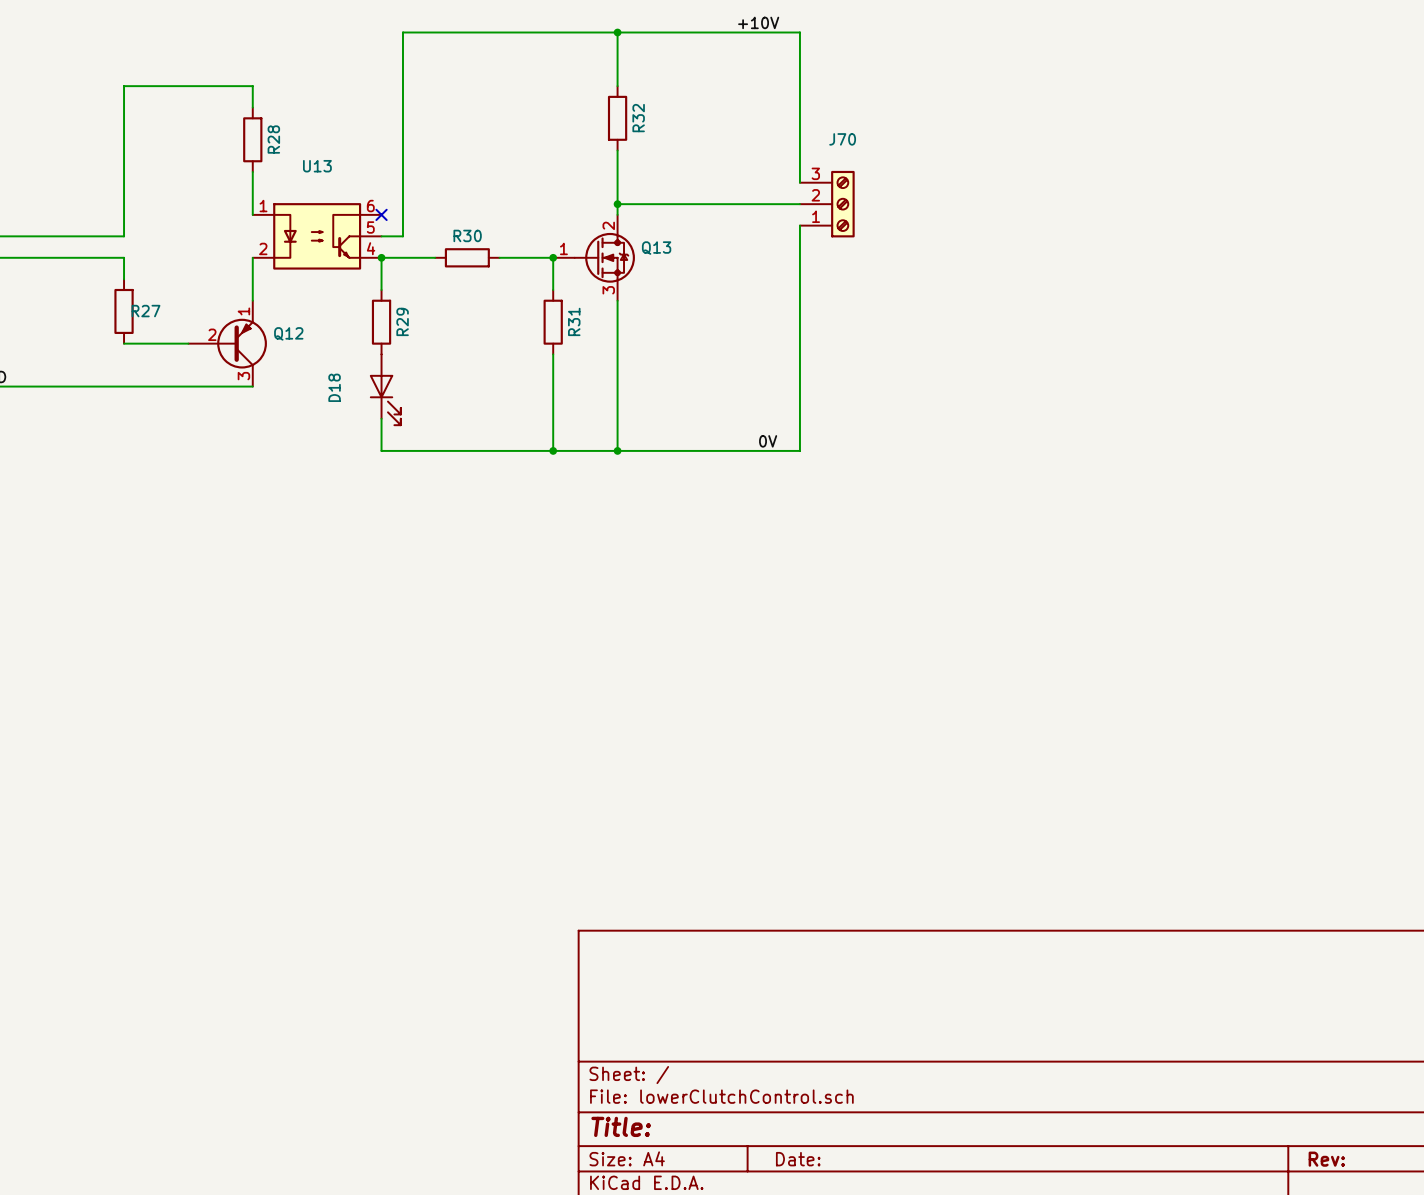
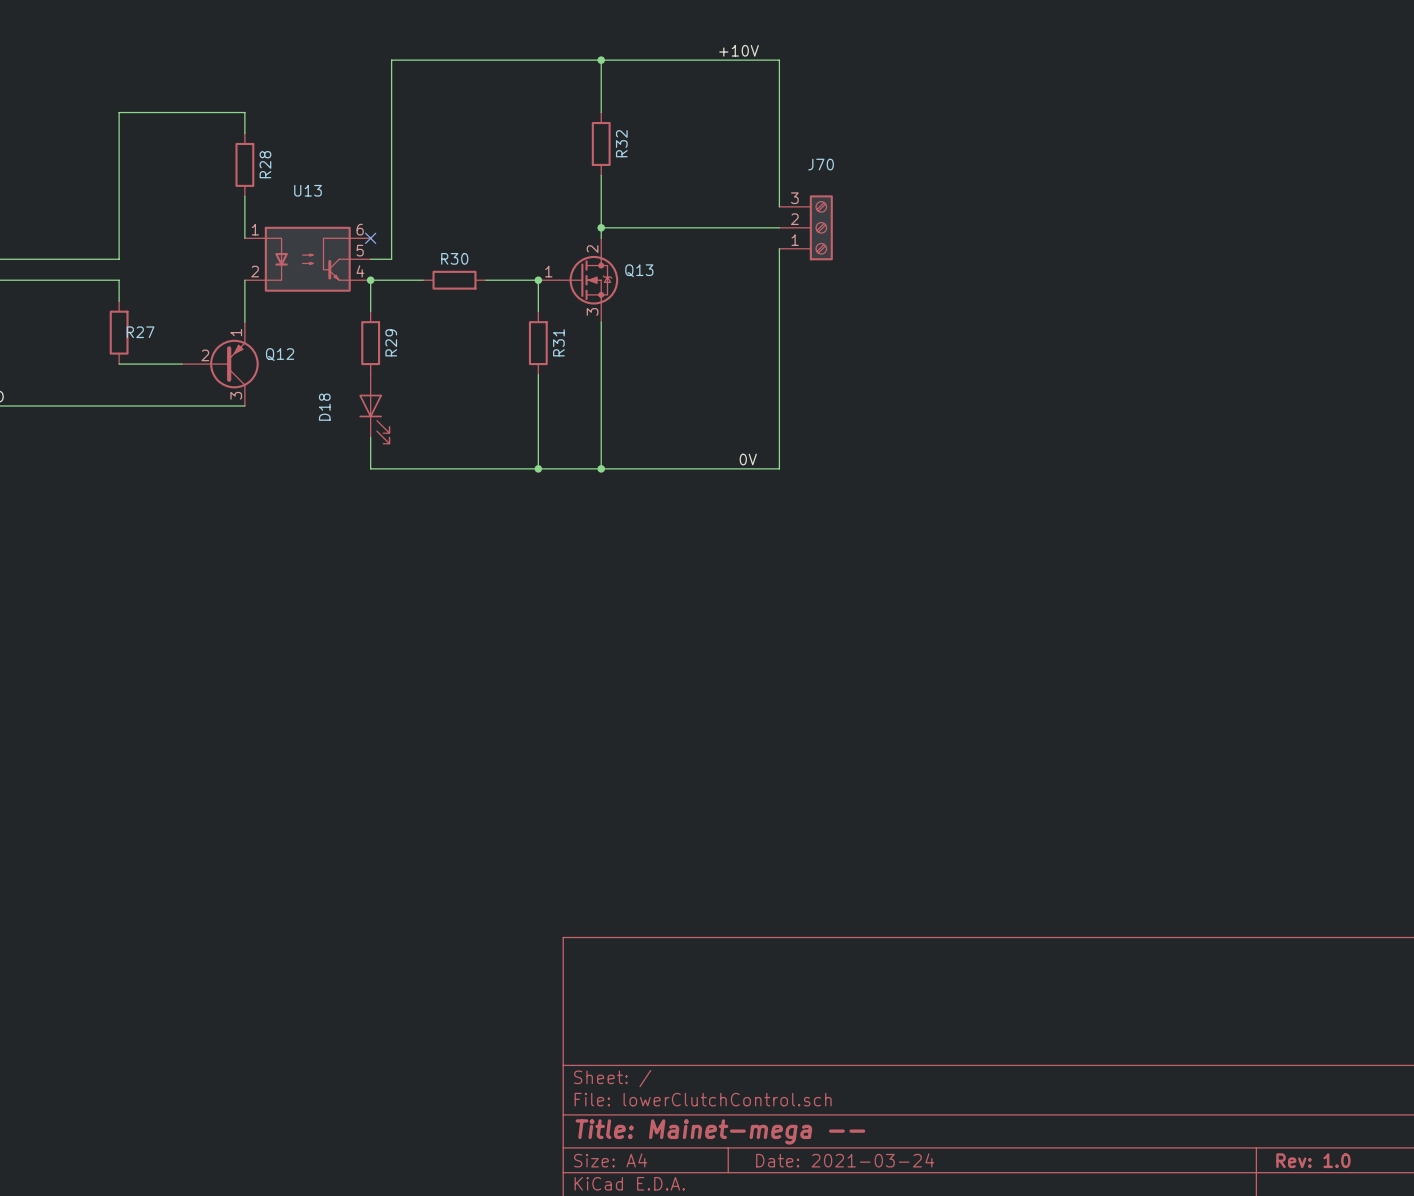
title block: Title: (621, 1126) -> Title: Mainet-mega -- (720, 1131)
title block: Date: (798, 1159) -> Date: 2021-03-24 (845, 1160)
title block: Rev: (1326, 1159) -> Rev: 1.0 (1313, 1160)

